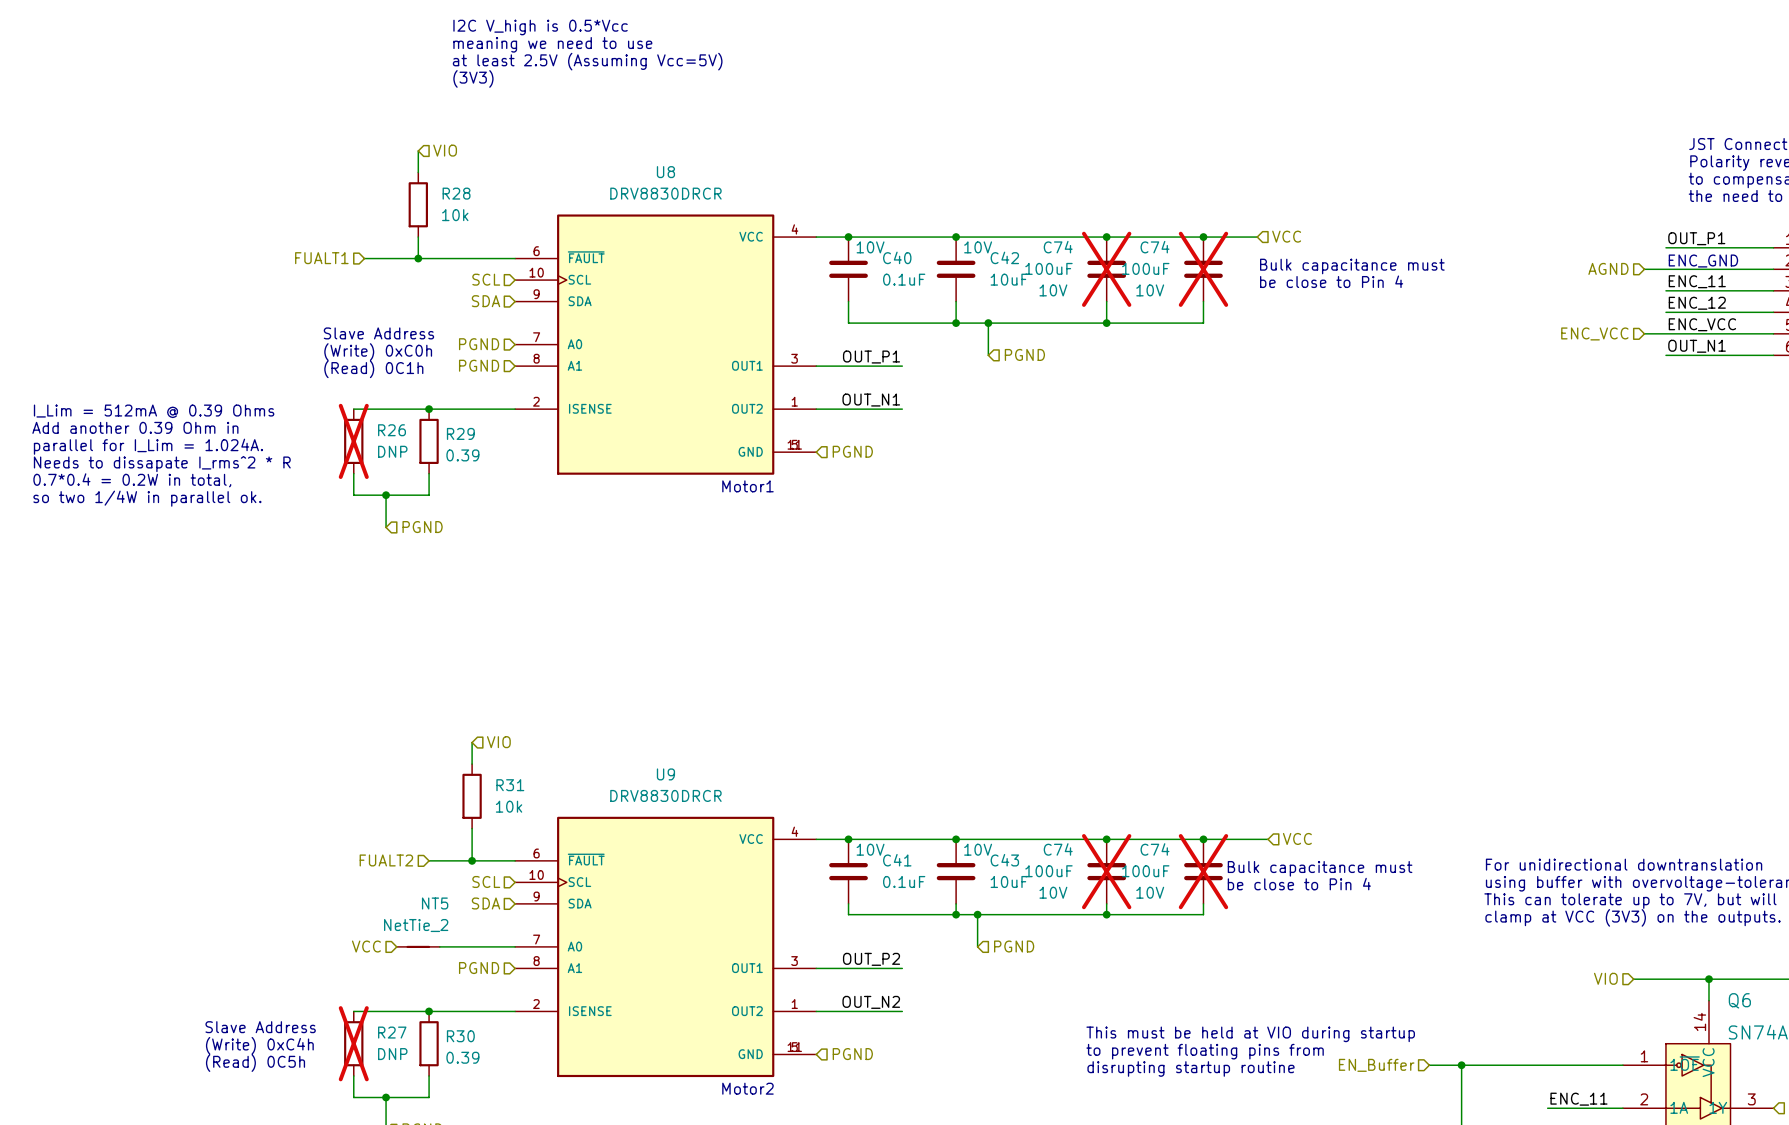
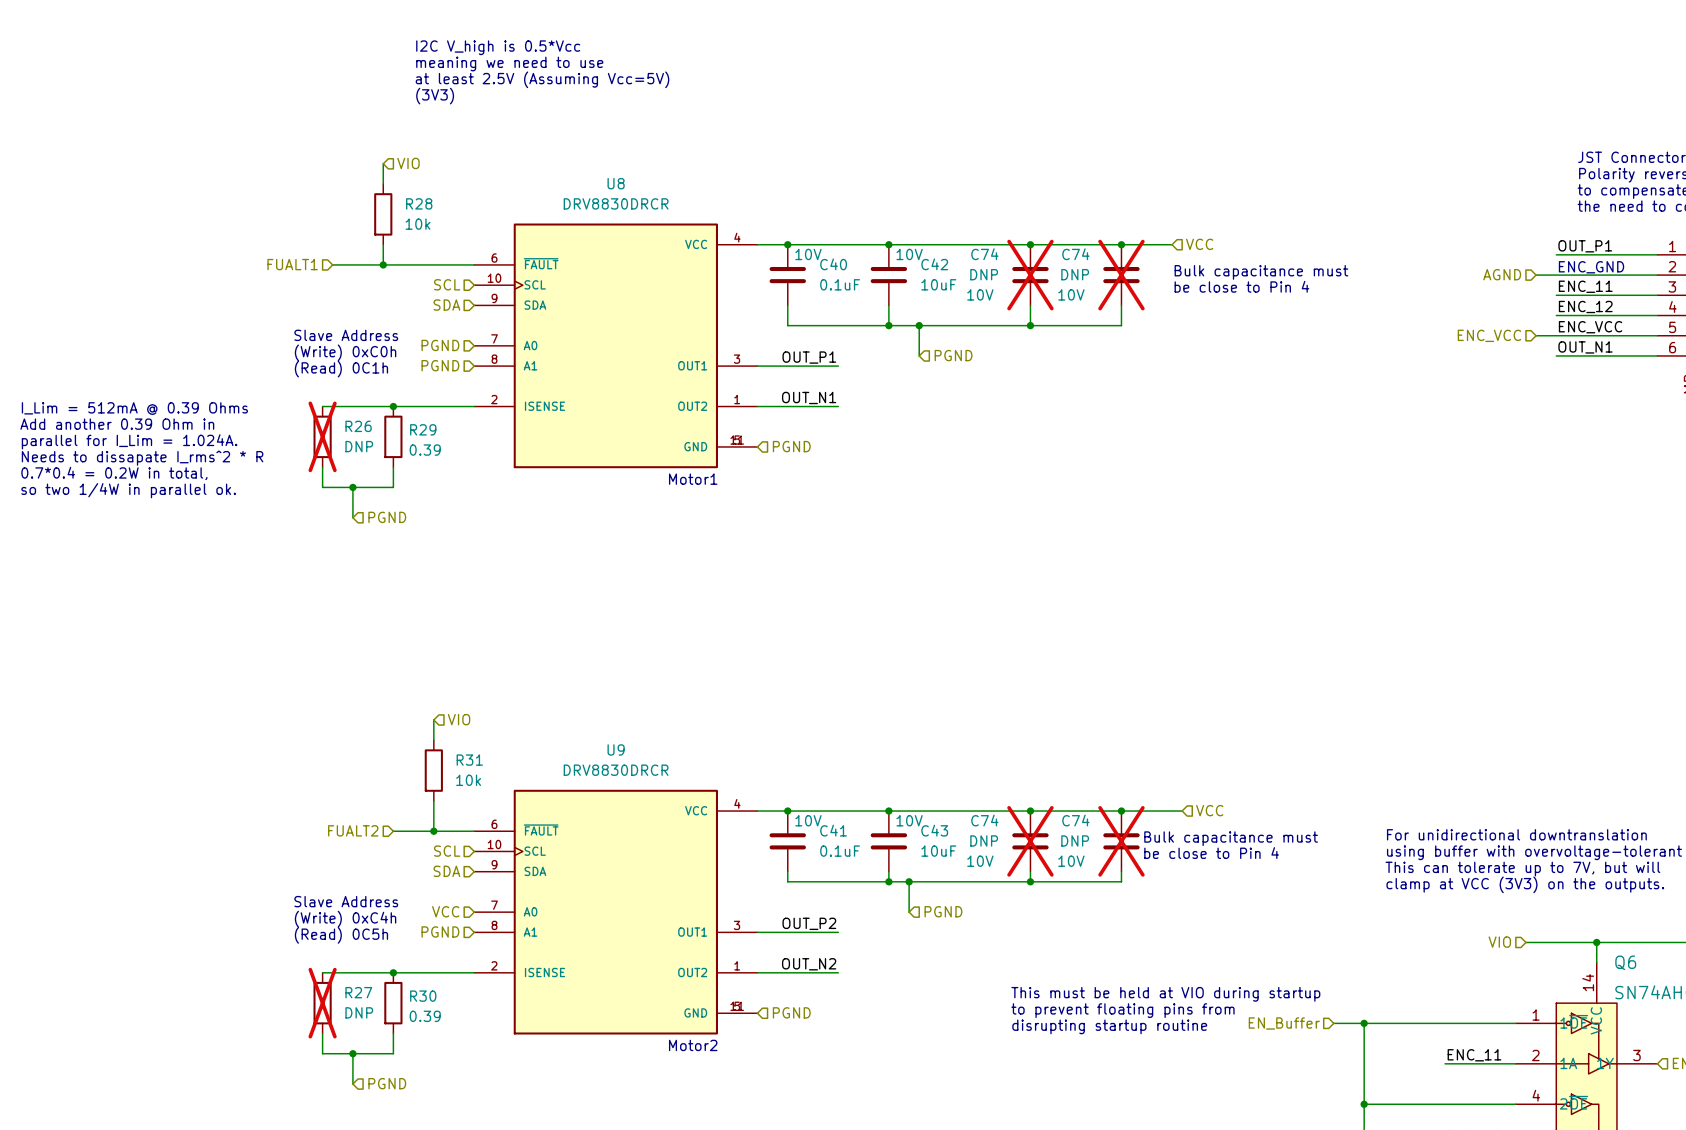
C74 value: 100uF (1048, 268) -> DNP (984, 274)
C74 value: 100uF (1145, 268) -> DNP (1075, 274)
C74 value: 100uF (1048, 871) -> DNP (984, 840)
C74 value: 100uF (1145, 871) -> DNP (1075, 840)
hierarchical label position: VCC (366, 946) -> VCC (445, 911)
NT5: NetTie_2 (418, 946) -> none
wire: (439, 946) (515, 946) -> none
text position: Slave Address (260, 1027) -> Slave Address (346, 901)
text position: (Write) 0xC4h (259, 1045) -> (Write) 0xC4h (345, 919)
text position: (Read) 0C5h (255, 1063) -> (Read) 0C5h (341, 935)

